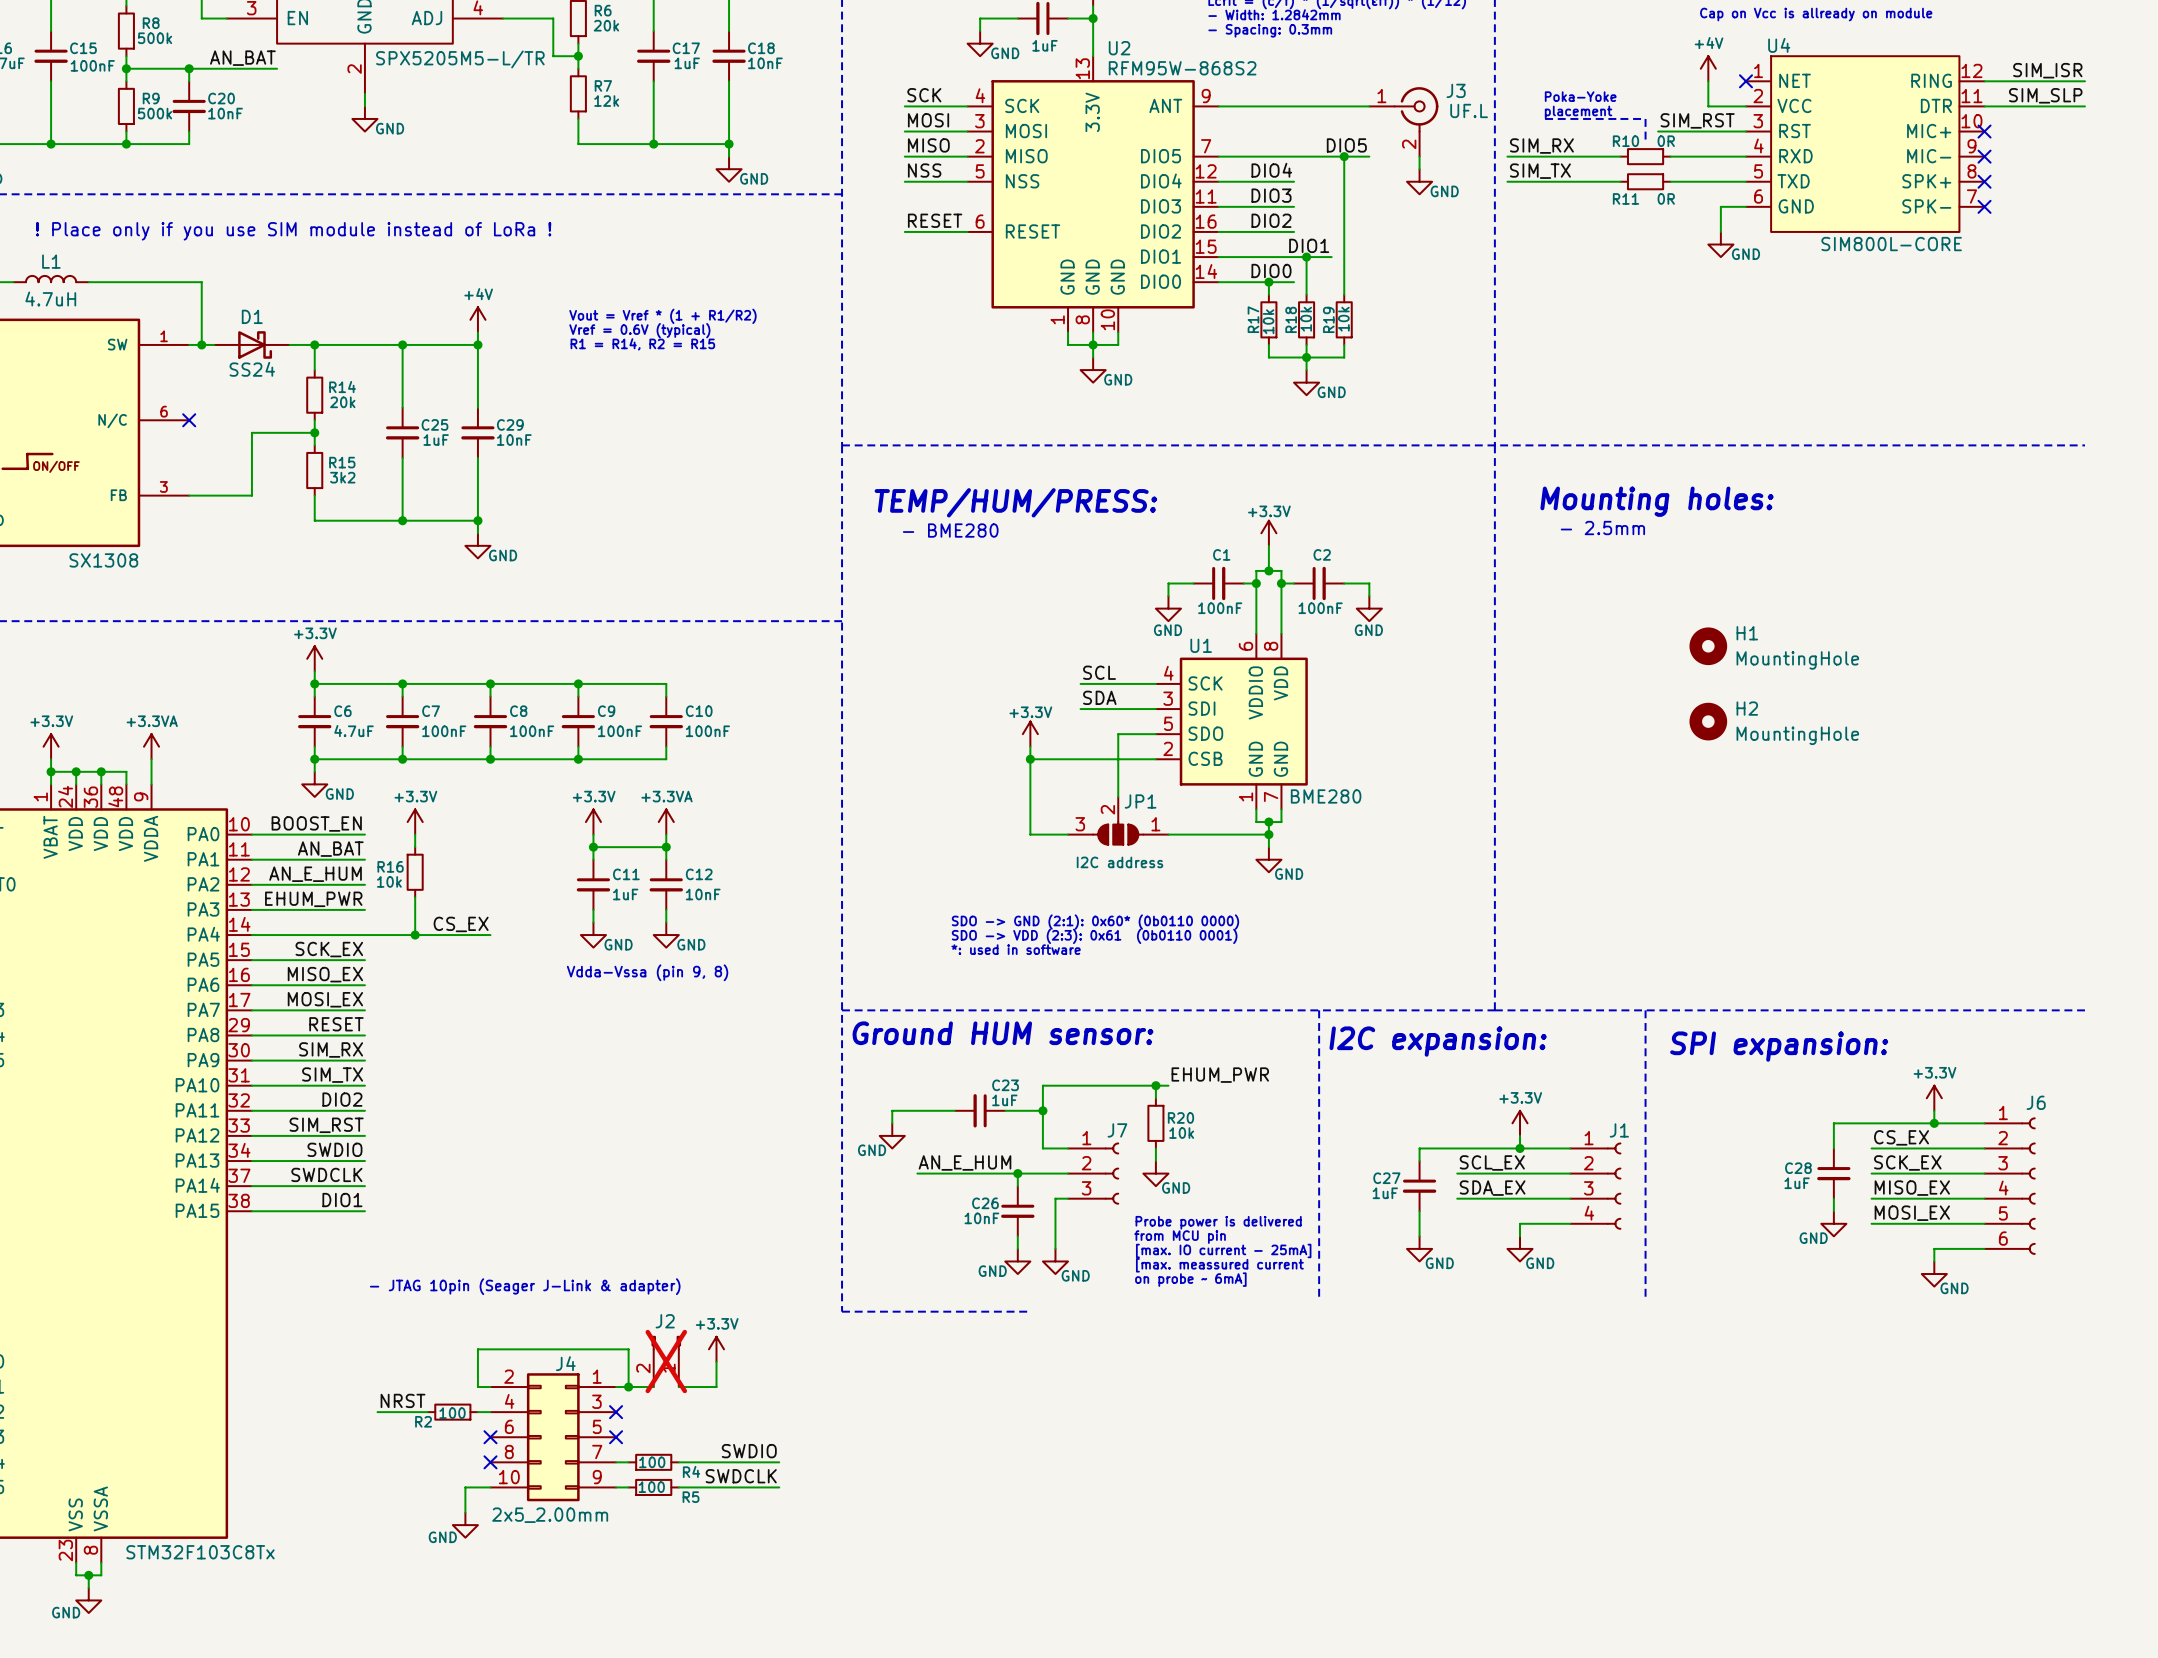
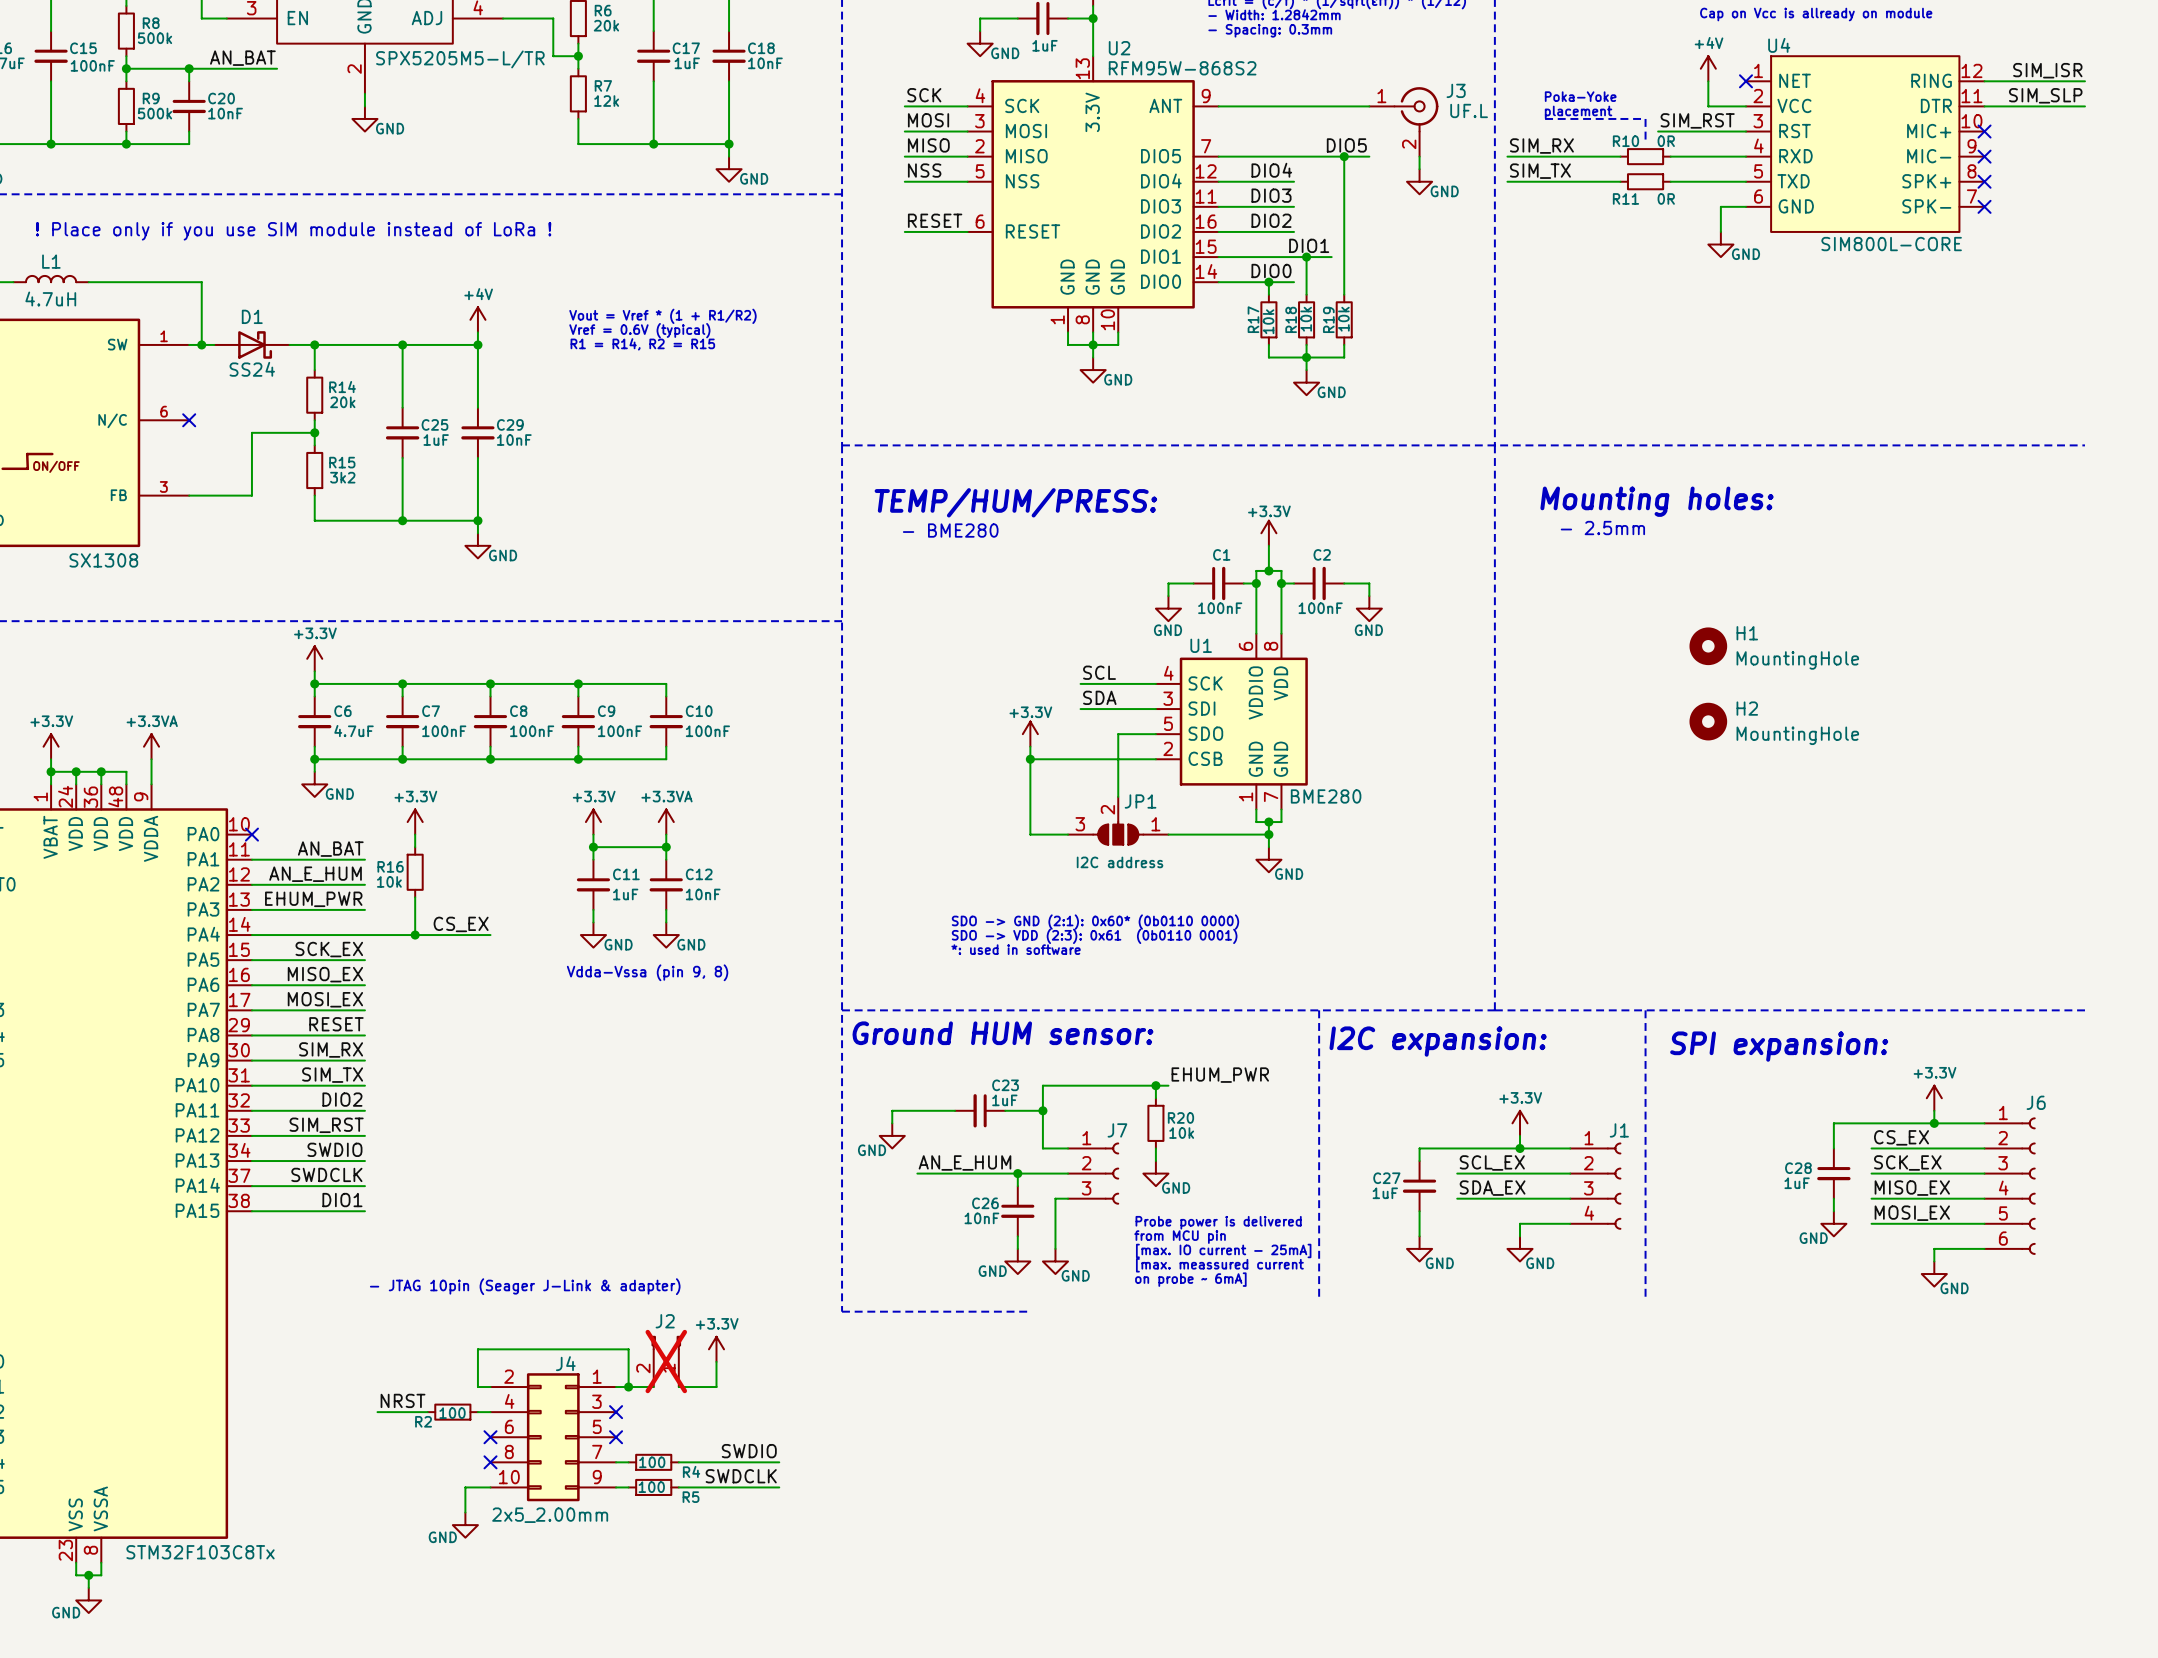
label: BOOST_EN (316, 823) -> none
wire: (251, 834) (364, 834) -> none
no-connect mark: none -> (251, 834)

